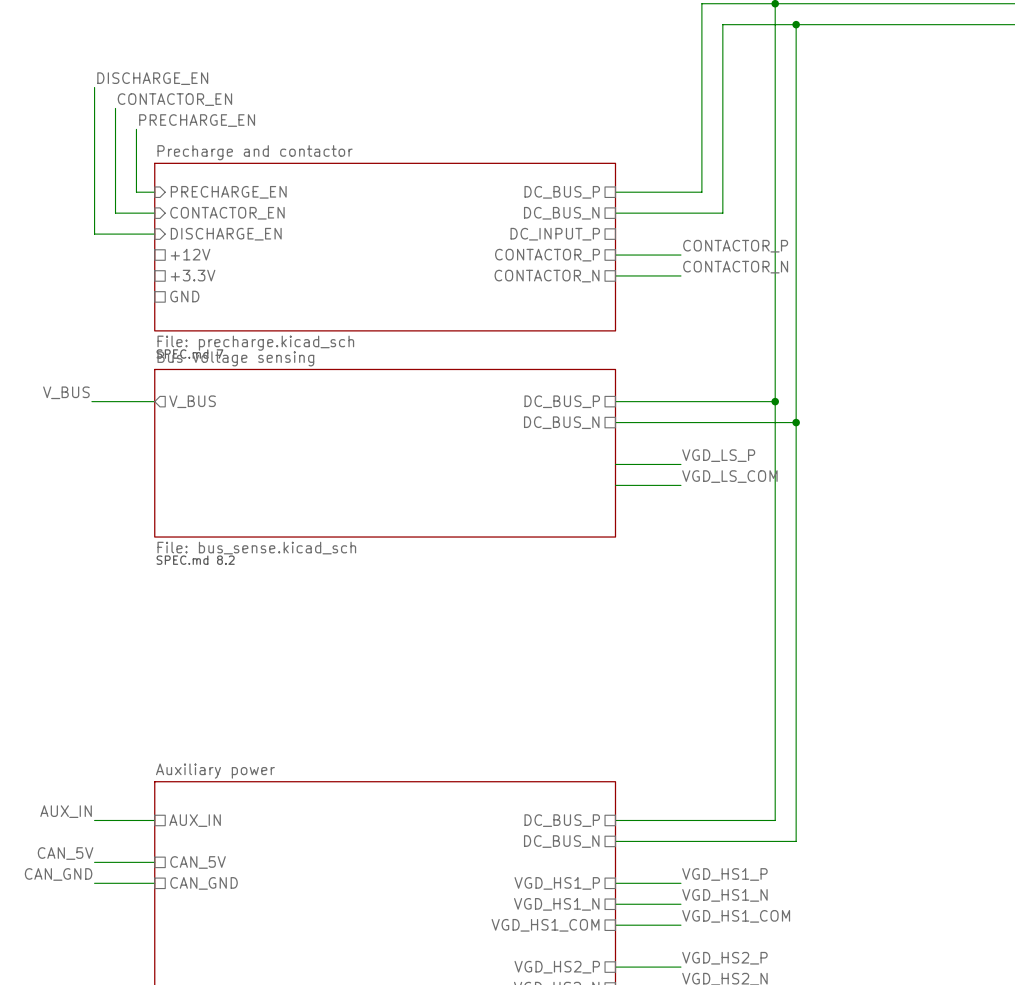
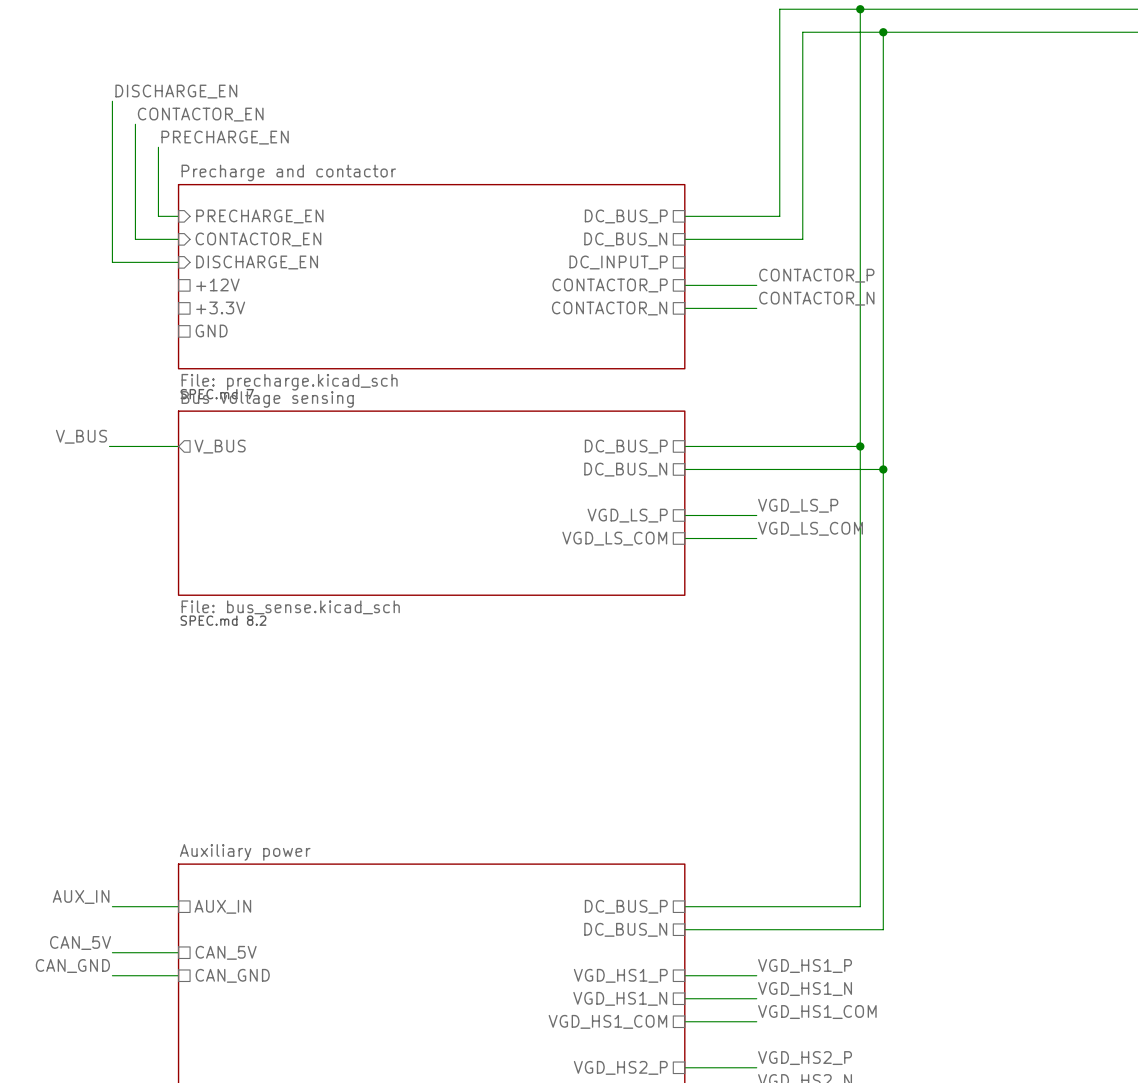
sheet pin: none -> VGD_LS_P (627, 515)
sheet pin: none -> VGD_LS_COM (614, 538)

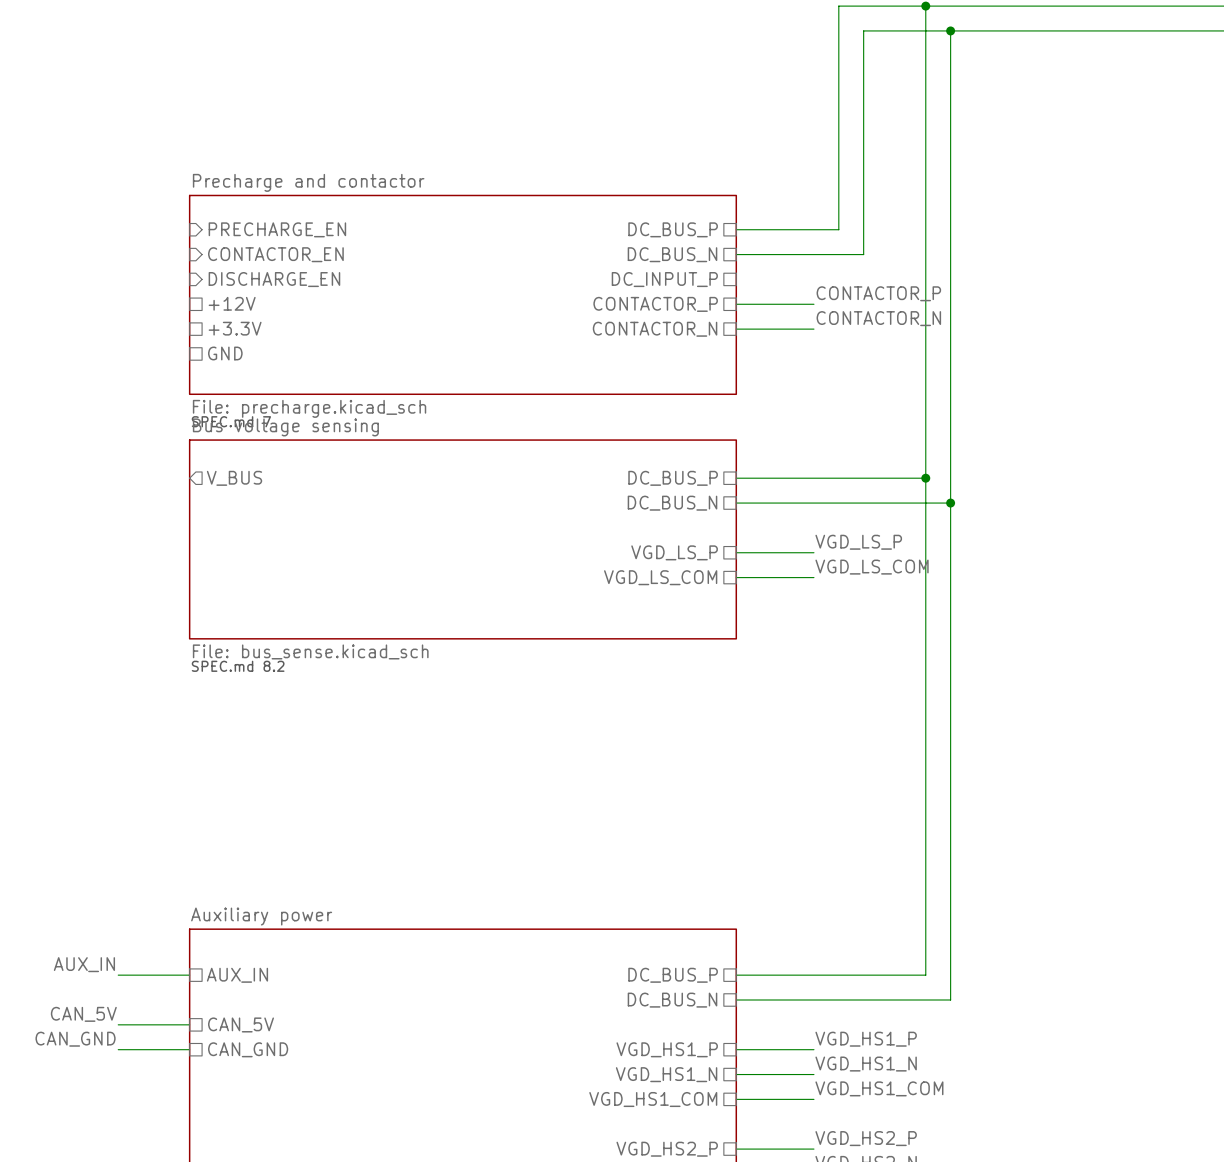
label: DISCHARGE_EN (176, 91) -> none
wire: (112, 101) (112, 262) (178, 262) -> none
label: CONTACTOR_EN (200, 114) -> none
wire: (135, 124) (135, 239) (178, 239) -> none
label: PRECHARGE_EN (225, 137) -> none
wire: (158, 147) (158, 216) (178, 216) -> none
label: V_BUS (81, 436) -> none
wire: (109, 446) (178, 446) -> none

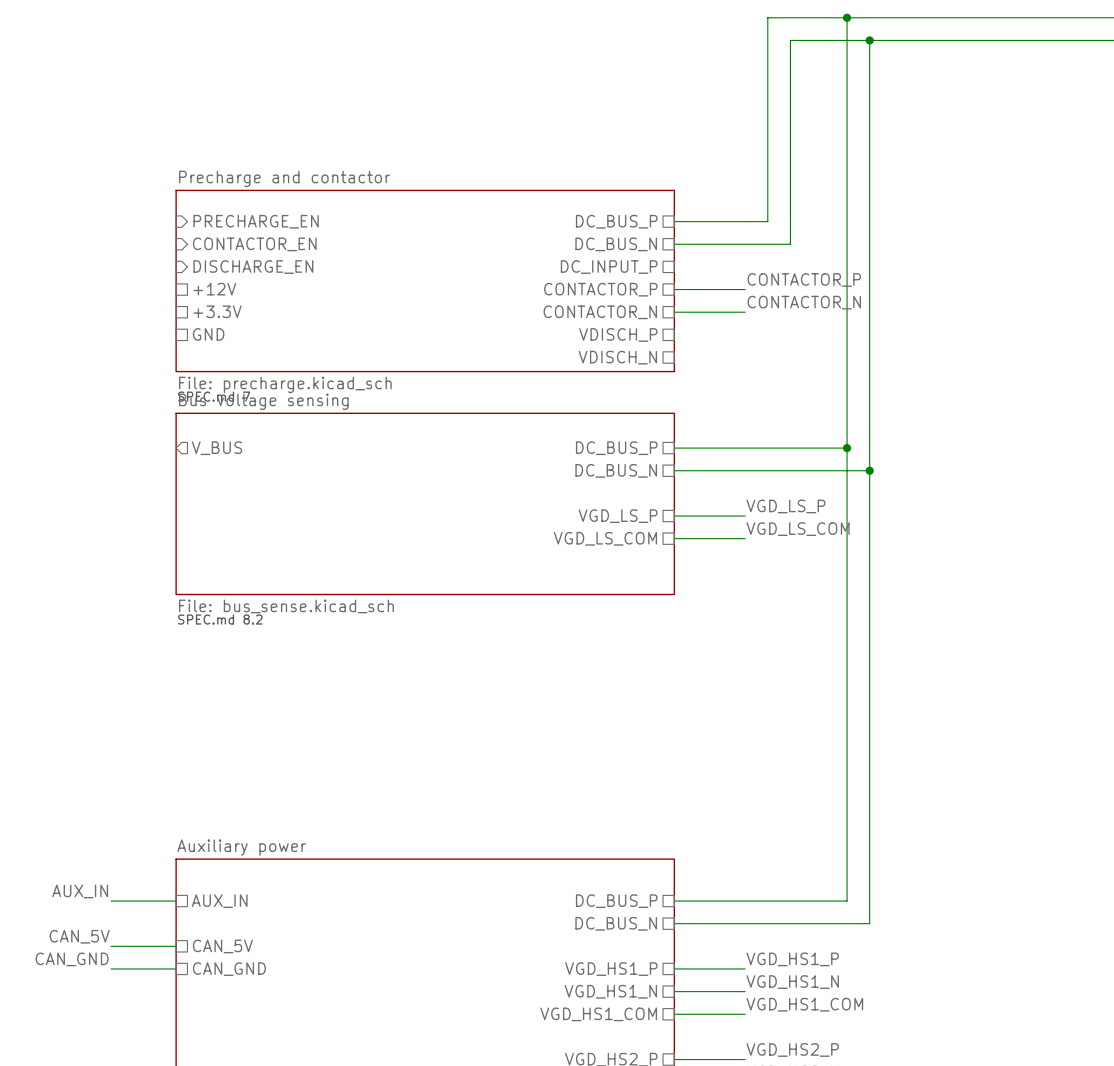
sheet pin: none -> VDISCH_P (618, 334)
sheet pin: none -> VDISCH_N (617, 357)

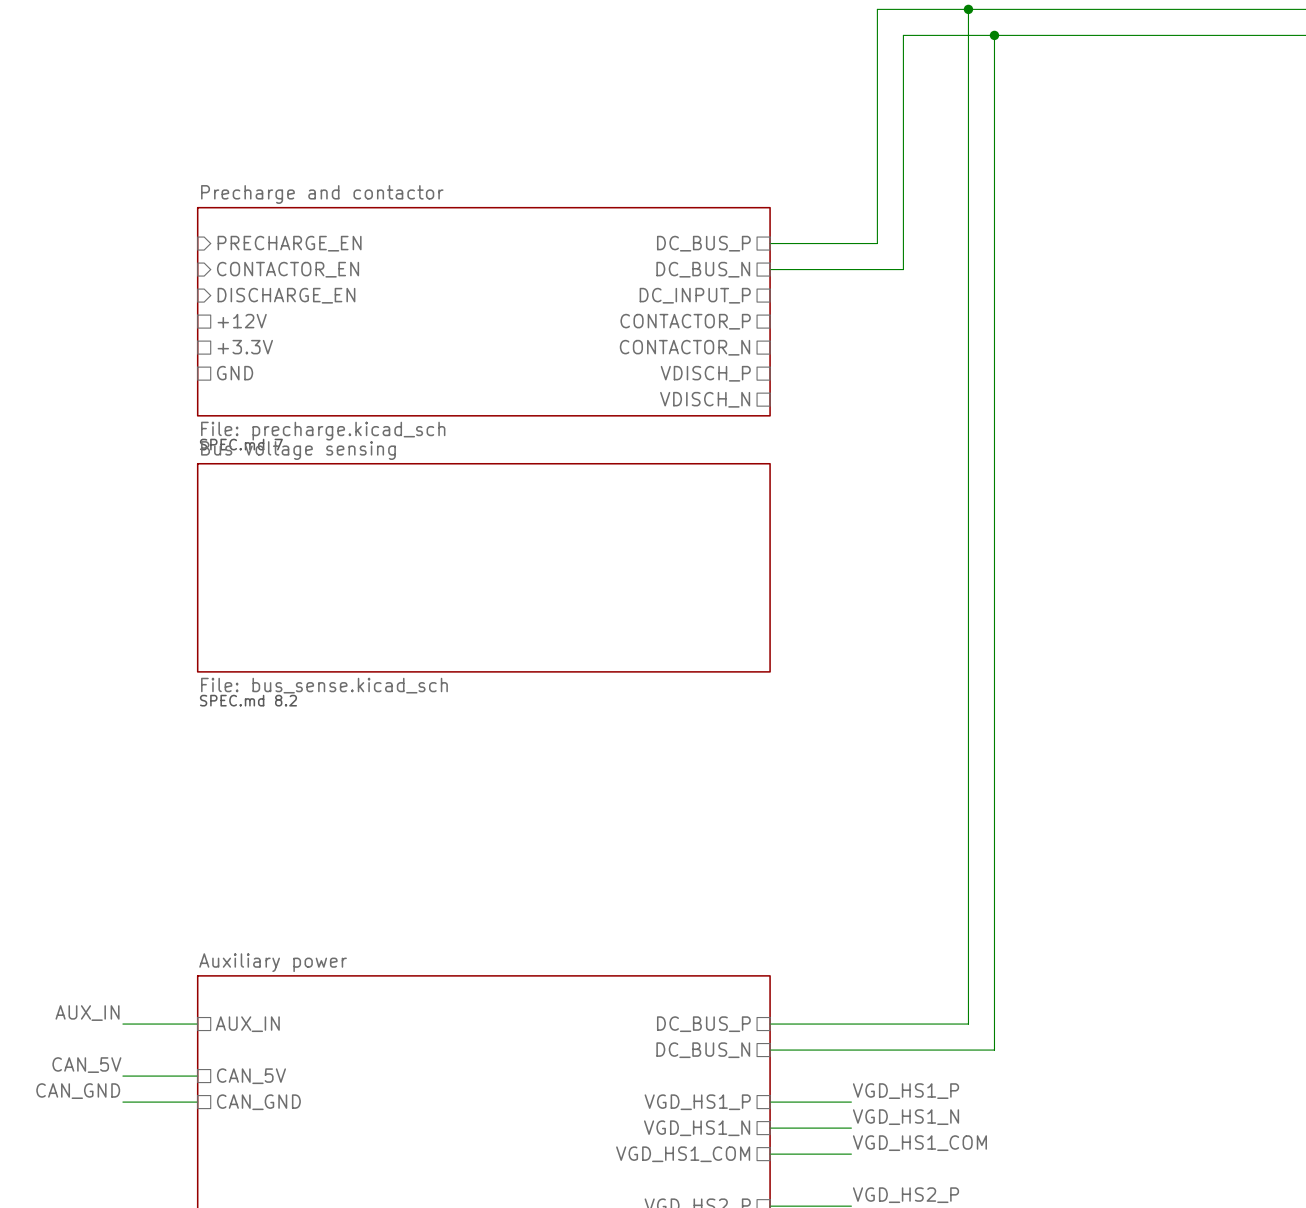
label: CONTACTOR_P (804, 279) -> none
wire: (674, 289) (745, 289) -> none
label: CONTACTOR_N (804, 302) -> none
wire: (674, 312) (745, 312) -> none
sheet pin: V_BUS (217, 448) -> none
sheet pin: DC_BUS_P (616, 448) -> none
wire: (674, 448) (847, 448) -> none
junction: (847, 448) -> none
sheet pin: DC_BUS_N (616, 470) -> none
wire: (674, 470) (869, 470) -> none
junction: (869, 470) -> none
label: VGD_LS_P (785, 506) -> none
sheet pin: VGD_LS_P (618, 516) -> none
wire: (674, 516) (745, 516) -> none
label: VGD_LS_COM (798, 529) -> none
sheet pin: VGD_LS_COM (605, 538) -> none
wire: (674, 538) (745, 538) -> none

